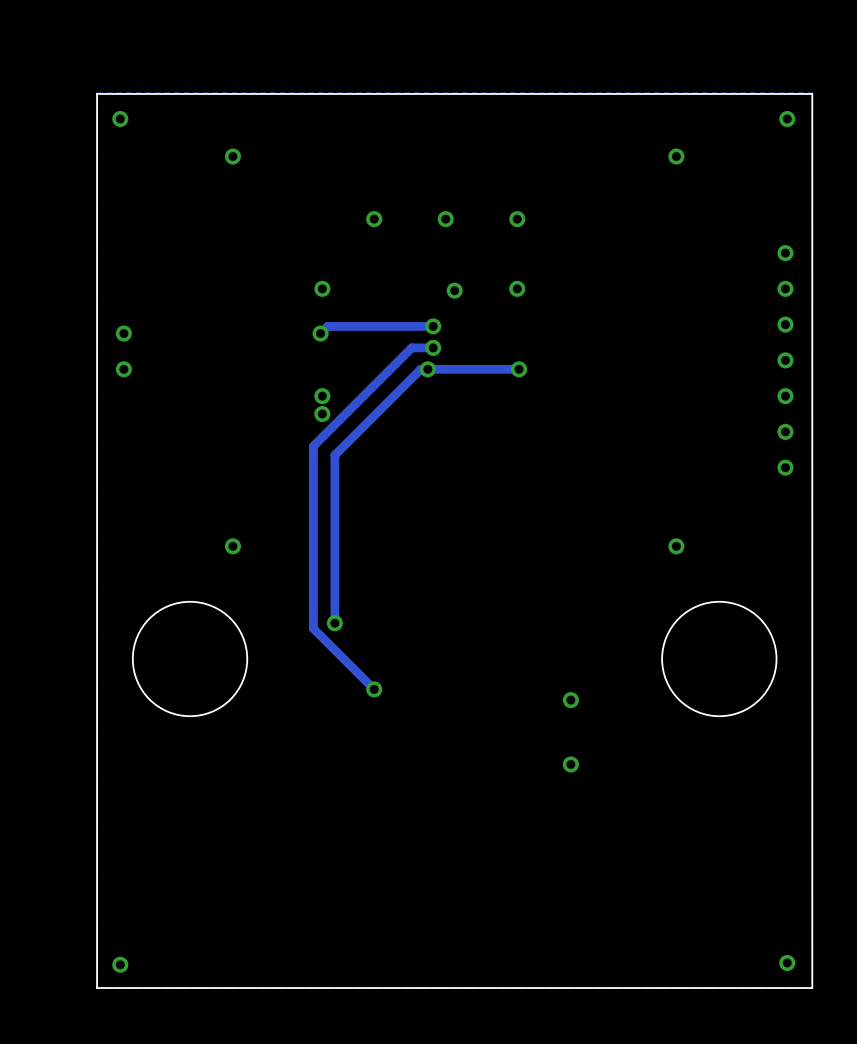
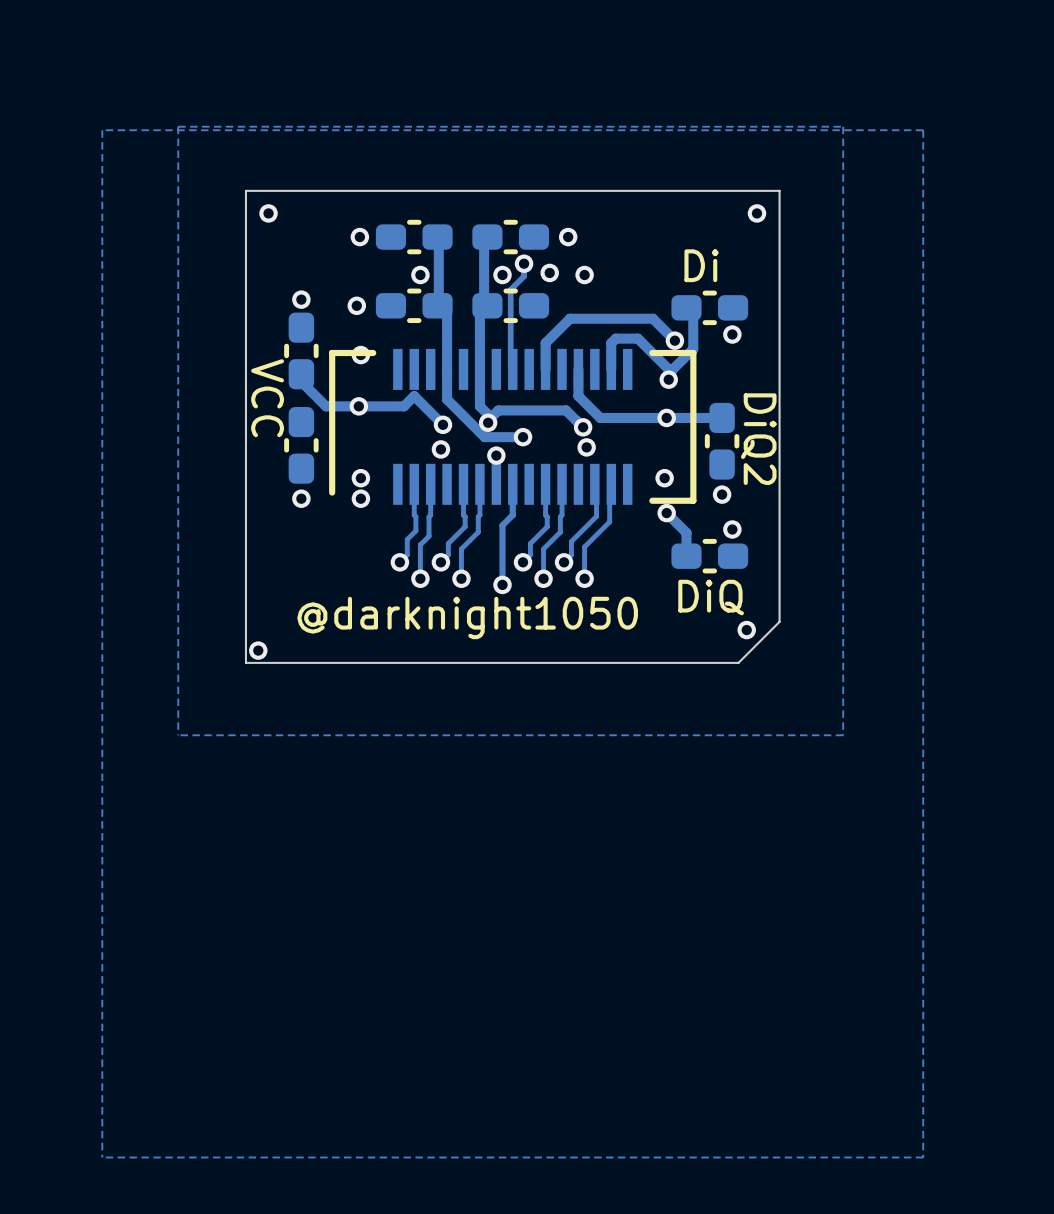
zone outline: none -> (843, 126) (178, 126) (178, 735) (843, 735) (843, 126)
board edge: (812, 93) (97, 93) (97, 988) (812, 988) (812, 93) -> none
via: (120, 118) -> none
via: (787, 118) -> none
board edge: none -> (779, 190) (245, 190) (245, 662) (738, 662) (779, 621) (779, 190)
via position: (232, 156) -> (268, 213)
via position: (676, 156) -> (756, 213)
via: none -> (359, 237)
part: none -> (414, 237)
part: none -> (510, 237)
via: none -> (568, 237)
track: none -> (437, 242) (437, 305) (447, 315) (447, 399) (484, 437) (523, 437)
track: none -> (487, 242) (484, 245) (484, 302) (487, 305) (479, 313) (479, 406) (491, 417) (498, 410) (566, 410) (583, 427)
track: none -> (524, 263) (524, 276) (510, 289) (510, 367) (512, 369)
via: none -> (524, 263)
text: none -> Di (701, 265)
via: none -> (549, 272)
via: none -> (301, 299)
via: none -> (356, 305)
part: none -> (414, 305)
part: none -> (510, 305)
track: none -> (686, 307) (693, 314) (693, 348) (668, 373)
part: none -> (709, 307)
via: (785, 253) -> none
via: none -> (732, 334)
track: none -> (674, 340) (652, 318) (570, 318) (545, 343) (545, 369)
via: none -> (674, 340)
part: none -> (301, 350)
via: (517, 288) -> none
via: (785, 288) -> none
via: (454, 290) -> none
track: none -> (578, 369) (578, 396) (600, 417) (722, 417)
track: none -> (611, 369) (611, 343) (615, 338) (637, 338) (668, 369) (668, 379)
track: none -> (301, 374) (301, 381) (326, 406) (404, 406) (414, 396) (442, 424)
via: none -> (668, 379)
via: (785, 324) -> none
text: none -> VCC (267, 398)
track: (433, 326) (327, 326) (320, 333) -> none
via: (433, 326) -> none
via: (123, 333) -> none
via: none -> (666, 417)
track: (433, 347) (411, 347) (313, 446) (313, 628) (374, 689) -> none
via: none -> (442, 424)
part: none -> (512, 426)
via: none -> (583, 427)
via: none -> (523, 437)
via: (785, 360) -> none
text: none -> DiQ2 (758, 439)
part: none -> (722, 441)
part: none -> (301, 445)
via: (123, 369) -> none
via position: (427, 369) -> (496, 455)
track: (519, 369) (420, 369) (334, 455) (334, 623) -> none
via: none -> (440, 449)
via: none -> (664, 478)
via: (785, 396) -> none
track: none -> (414, 484) (415, 530) (407, 539) (407, 554) (399, 562)
track: none -> (430, 484) (429, 536) (420, 544) (420, 578)
track: none -> (463, 484) (465, 526) (448, 543) (448, 554) (440, 562)
track: none -> (479, 484) (478, 532) (461, 549) (461, 578)
track: none -> (512, 484) (512, 515) (502, 525) (502, 584)
track: none -> (545, 484) (547, 526) (530, 543) (530, 554) (523, 562)
track: none -> (562, 484) (560, 532) (543, 549) (543, 578)
track: none -> (594, 484) (596, 516) (571, 541) (571, 554) (564, 562)
track: none -> (611, 484) (609, 521) (584, 546) (584, 578)
via: none -> (722, 494)
via: none -> (301, 498)
track: none -> (666, 513) (686, 532) (686, 556)
via: none -> (666, 513)
via: (785, 431) -> none
via: none -> (732, 529)
part: none -> (709, 556)
via: (785, 467) -> none
via: none -> (399, 562)
via: none -> (440, 562)
via: none -> (523, 562)
via: none -> (564, 562)
via: none -> (420, 578)
via: none -> (461, 578)
via: none -> (543, 578)
via: none -> (584, 578)
via: none -> (502, 584)
text: none -> DiQ (711, 597)
text: none -> @darknight1050 (467, 617)
via position: (676, 546) -> (746, 630)
round board edge: [131, 600, 249, 718] -> none
round board edge: [661, 600, 778, 718] -> none
via: (334, 623) -> none
via: (374, 689) -> none
via: (570, 700) -> none
via: (570, 764) -> none
via: (787, 962) -> none
via: (120, 964) -> none

